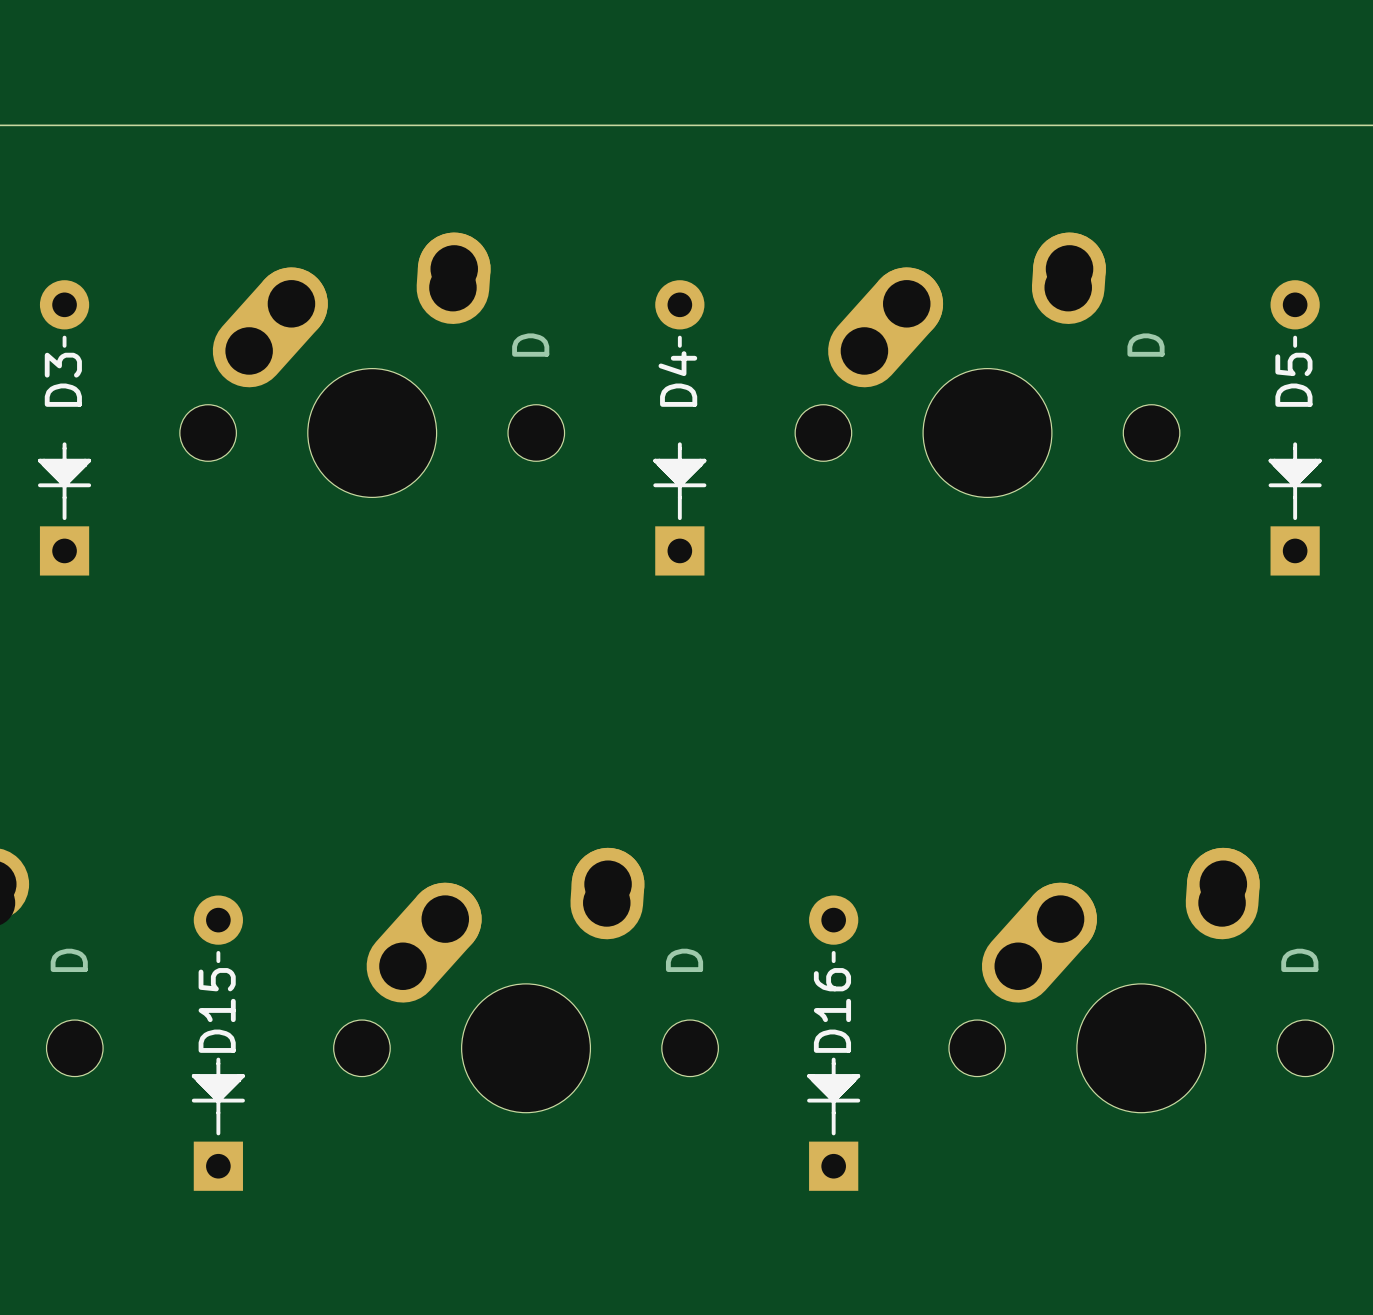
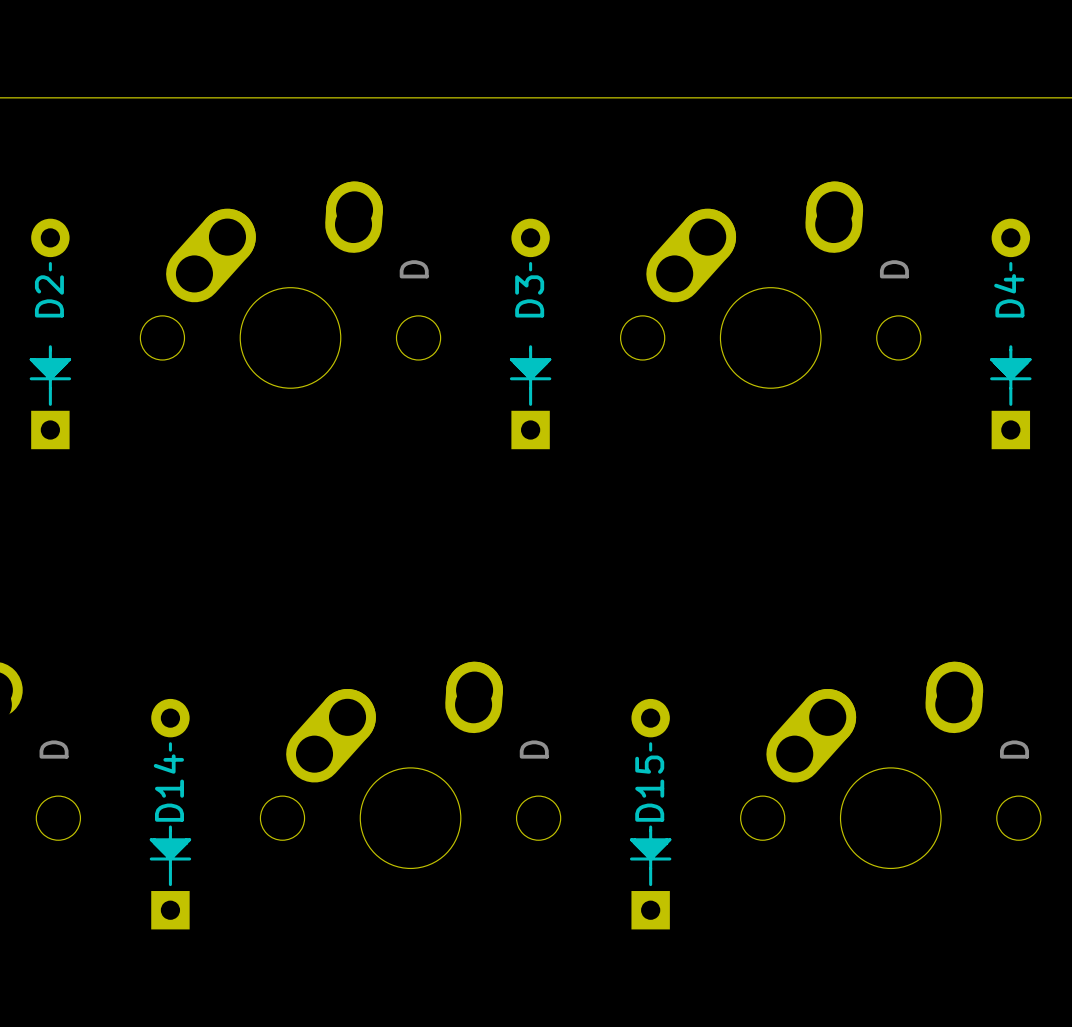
D3 name: D3 (63, 379) -> D2 (49, 296)
D4 name: D4 (677, 379) -> D3 (529, 296)
D5 name: D5 (1293, 379) -> D4 (1009, 295)
D15 name: D15 (217, 1010) -> D14 (168, 788)
D16 name: D16 (832, 1010) -> D15 (649, 788)

